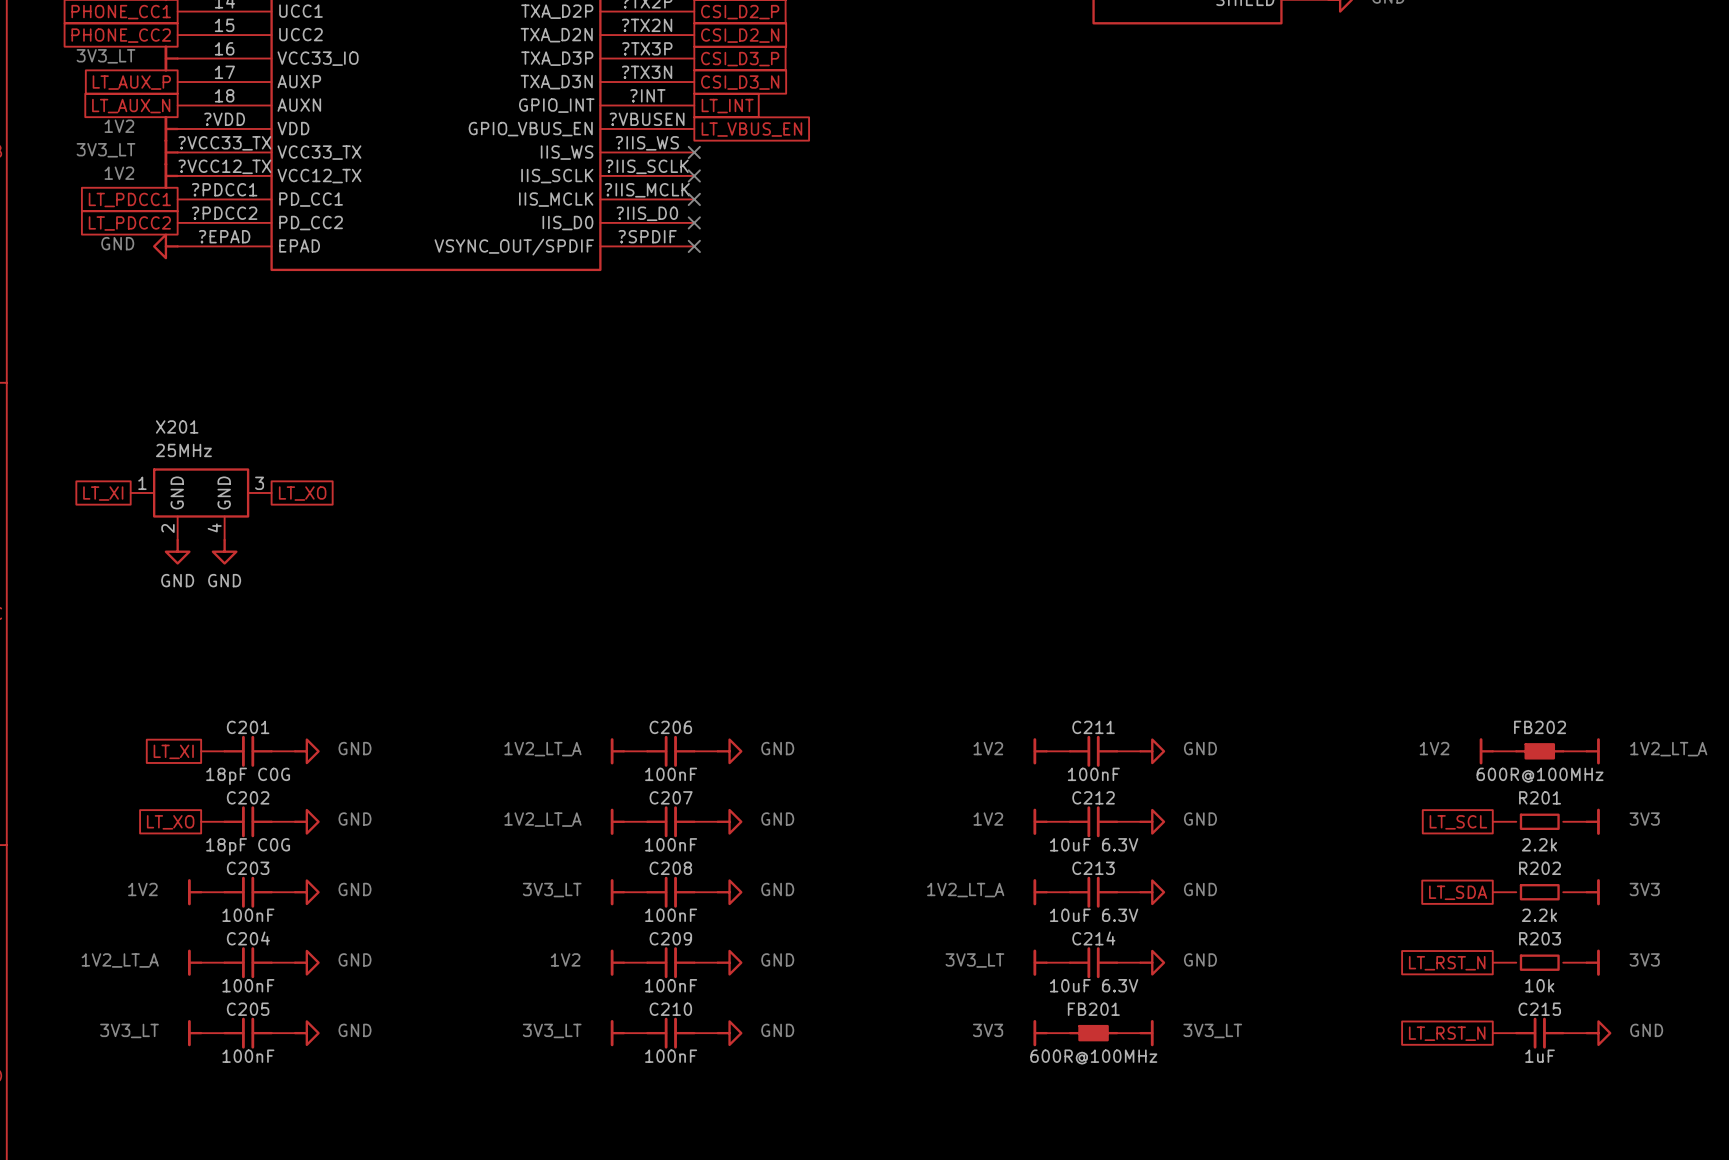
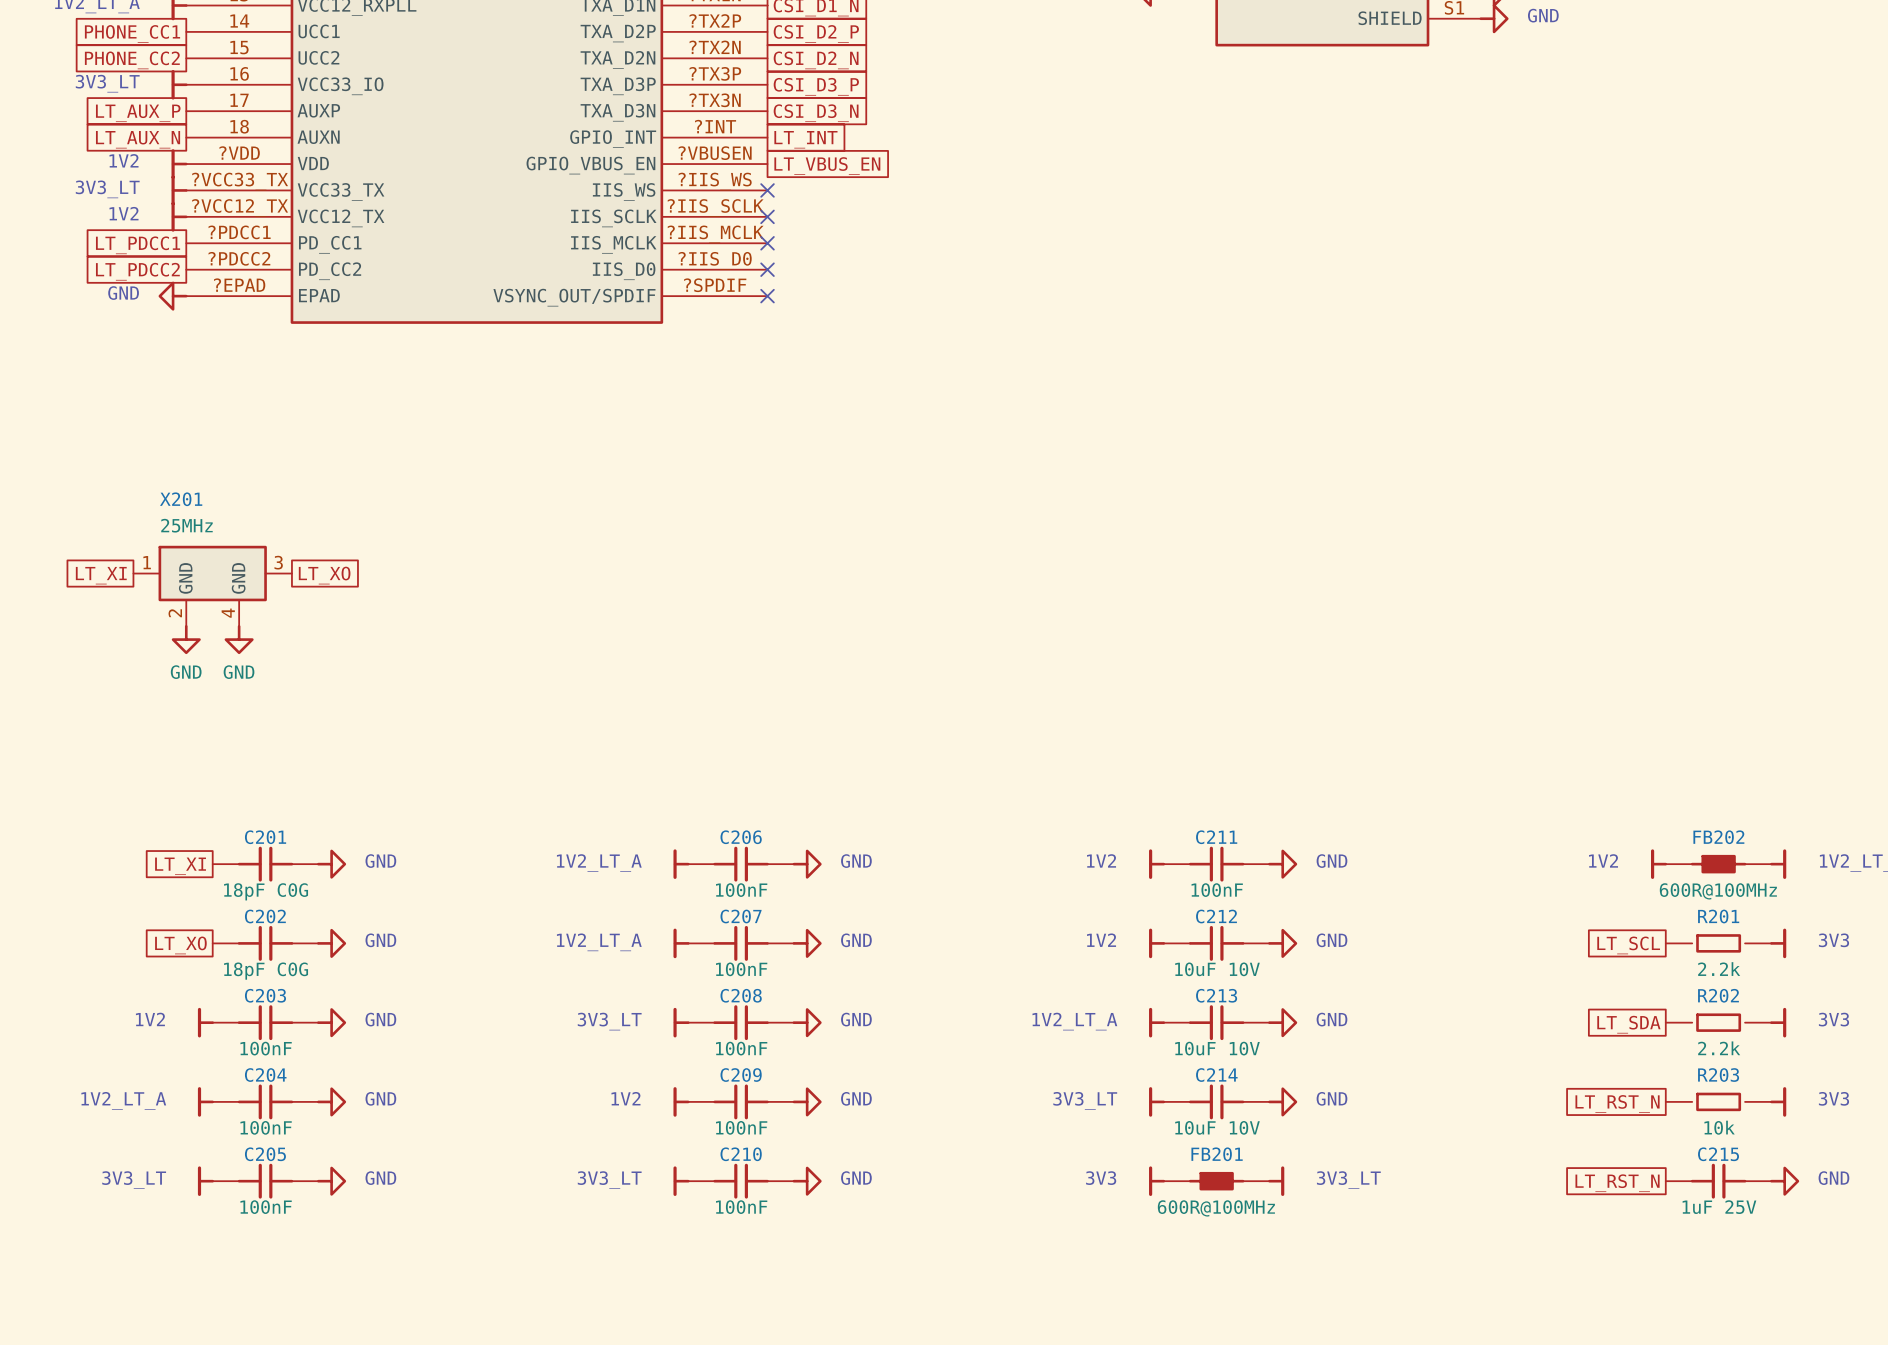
C212 value: 10uF 6.3V (1094, 844) -> 10uF 10V (1217, 969)
C213 value: 10uF 6.3V (1094, 915) -> 10uF 10V (1217, 1048)
C214 value: 10uF 6.3V (1094, 985) -> 10uF 10V (1217, 1127)
C215 value: 1uF (1540, 1056) -> 1uF 25V (1719, 1207)

